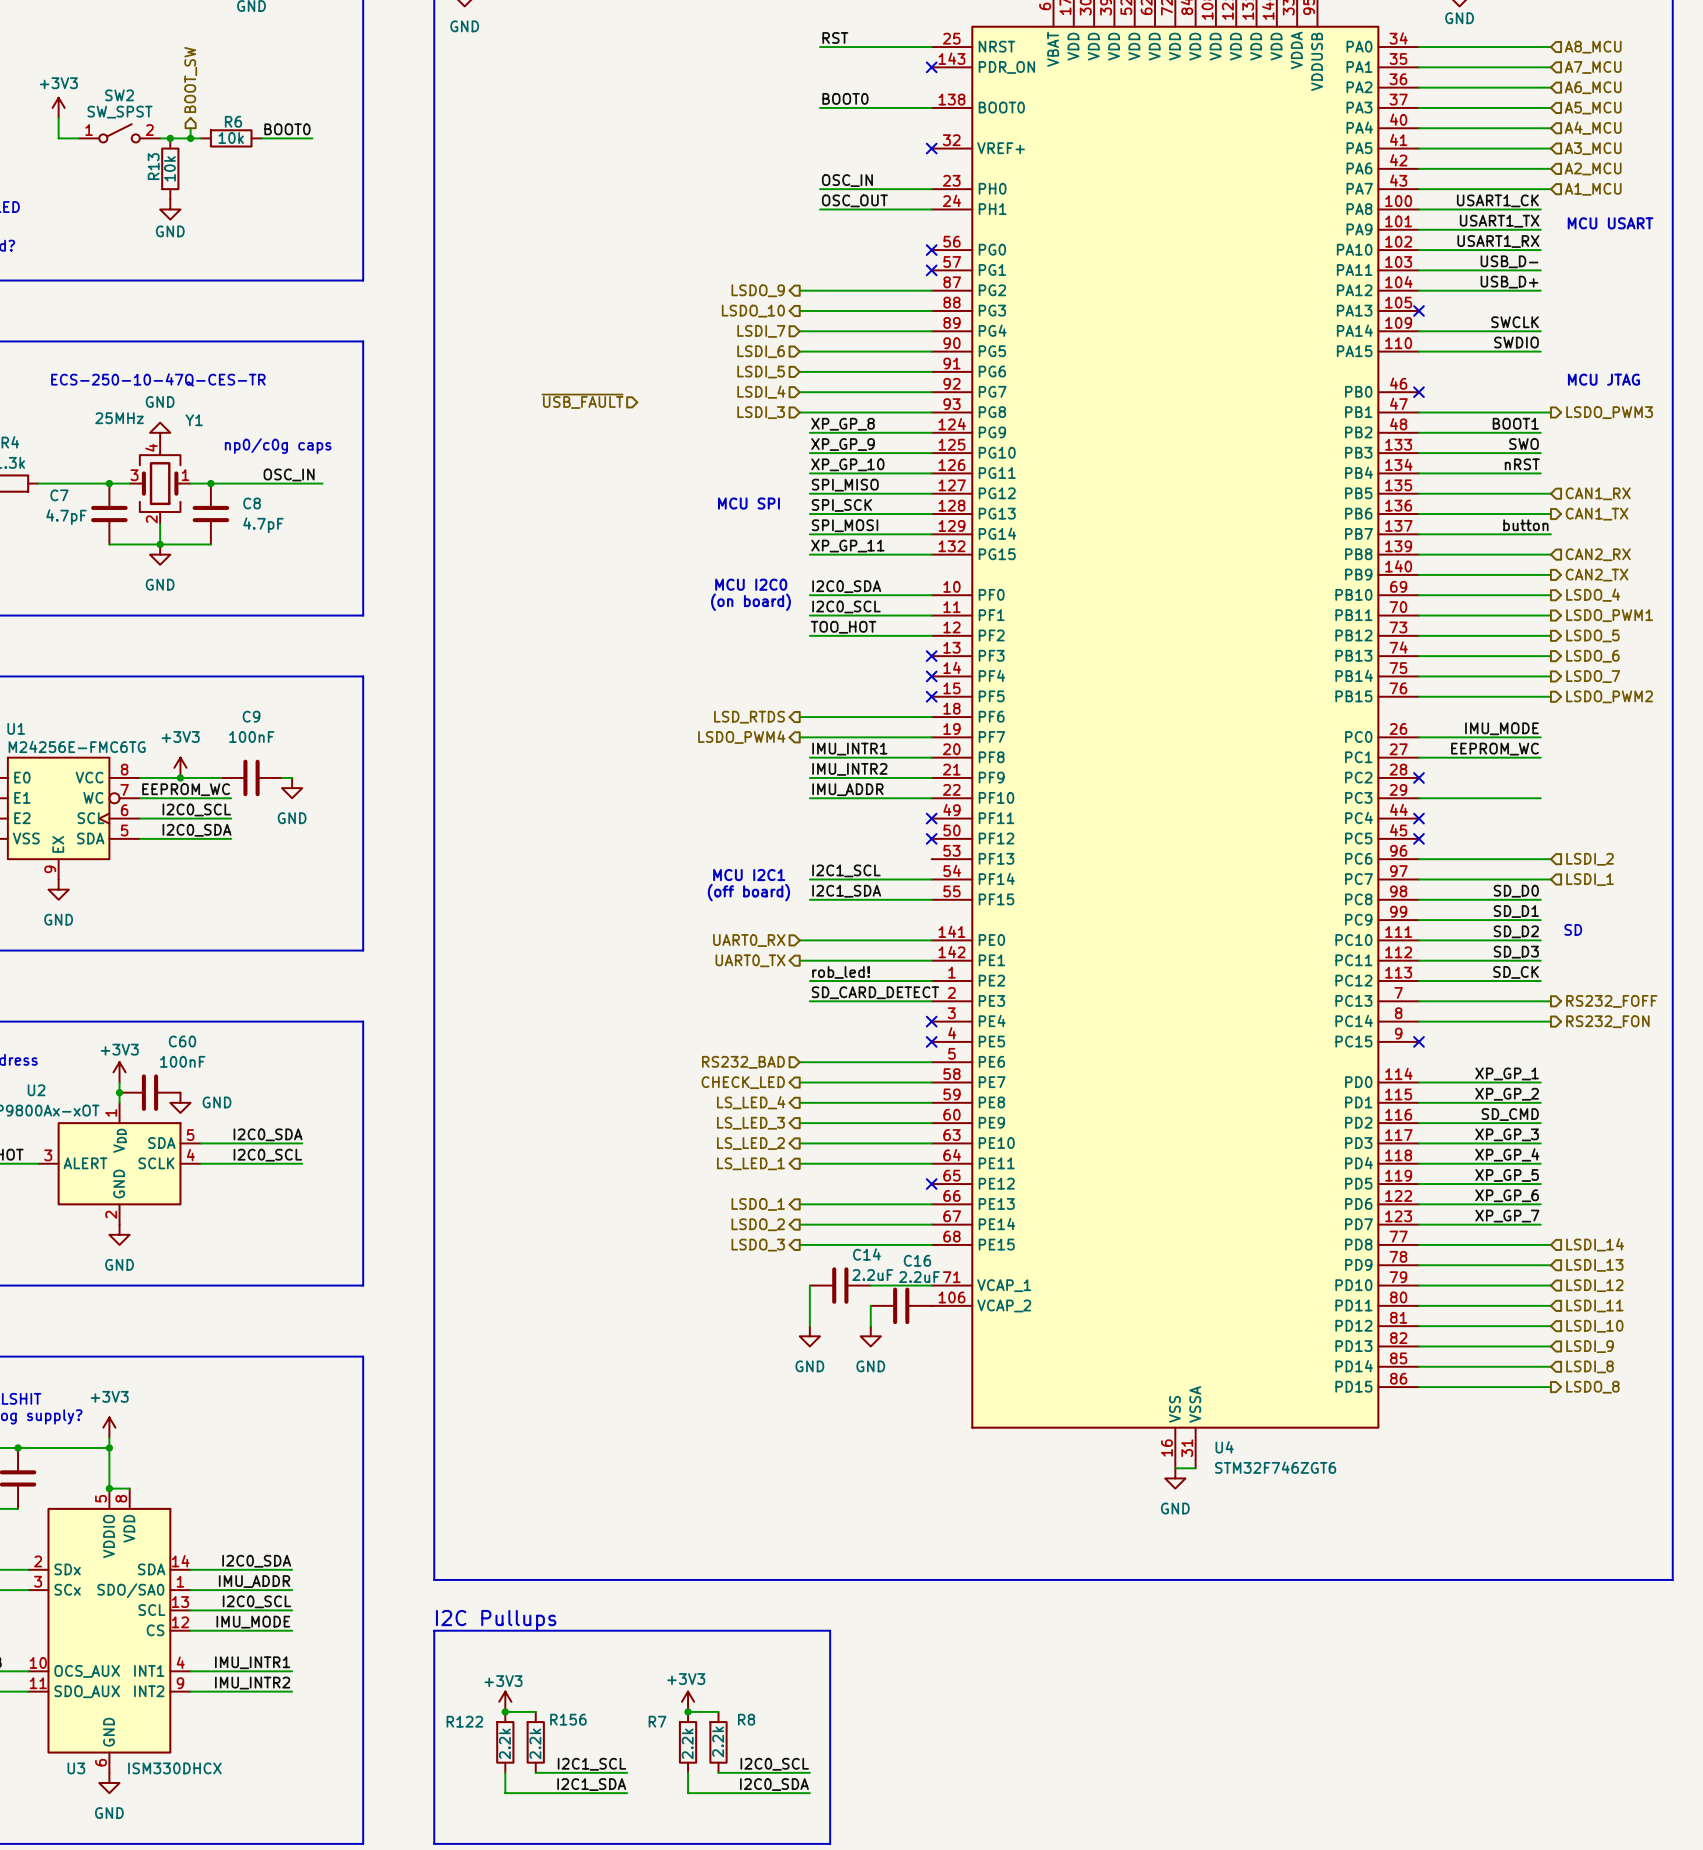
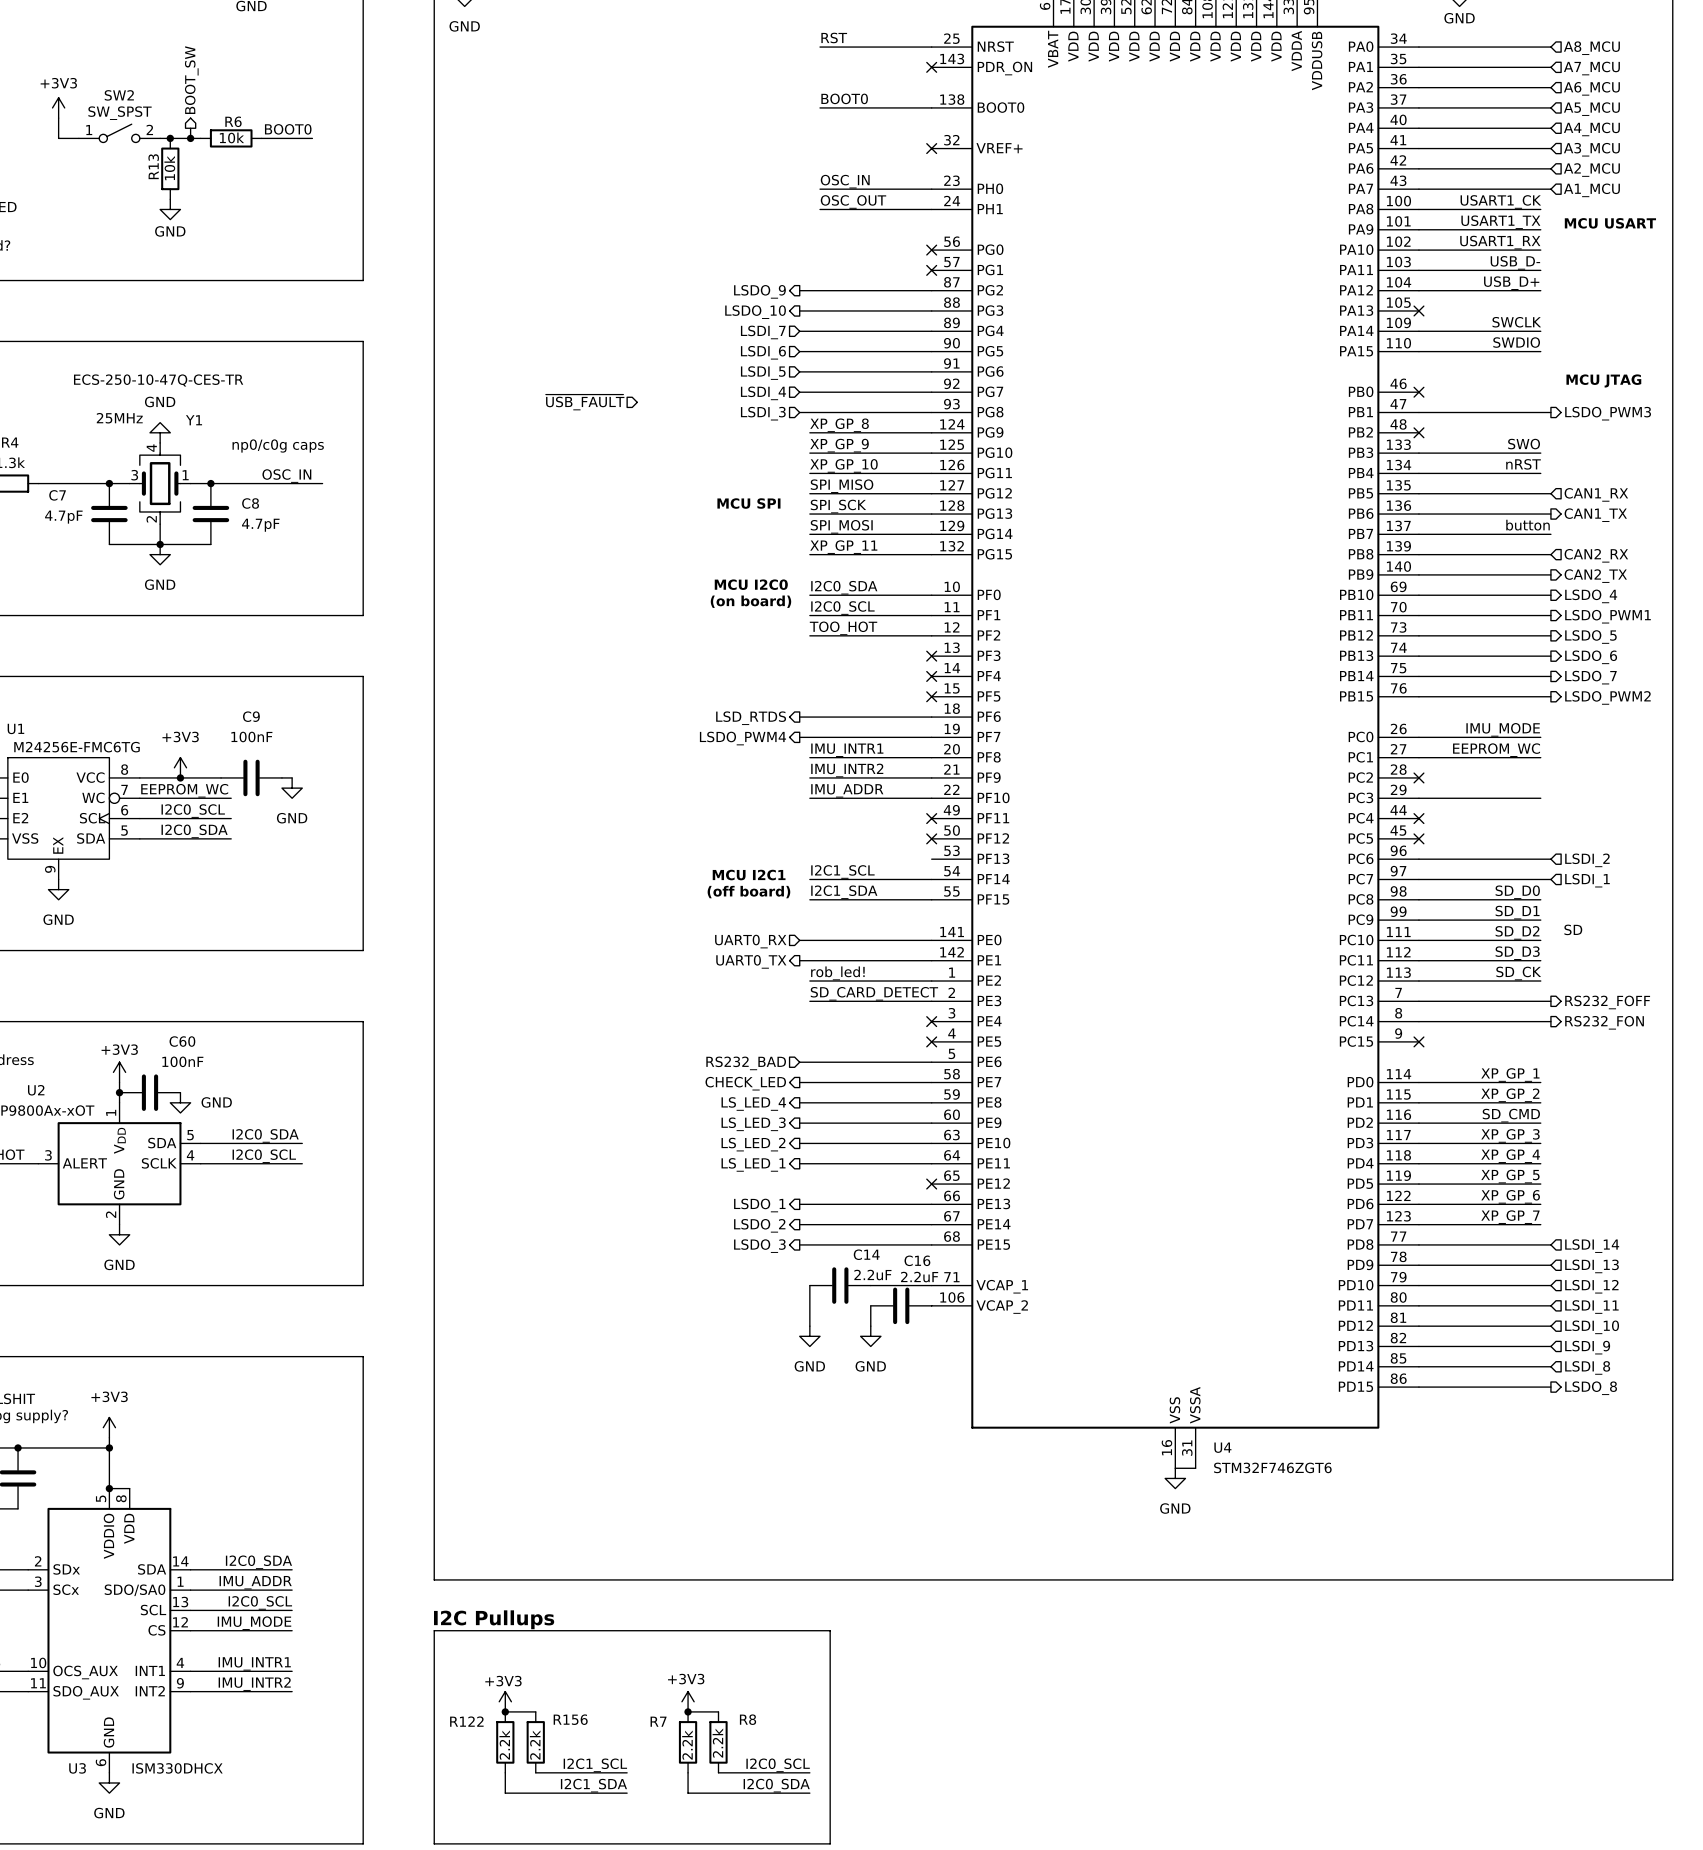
label: BOOT1 (1515, 423) -> none
wire: (1418, 432) (1540, 432) -> none
no-connect mark: none -> (1418, 432)

